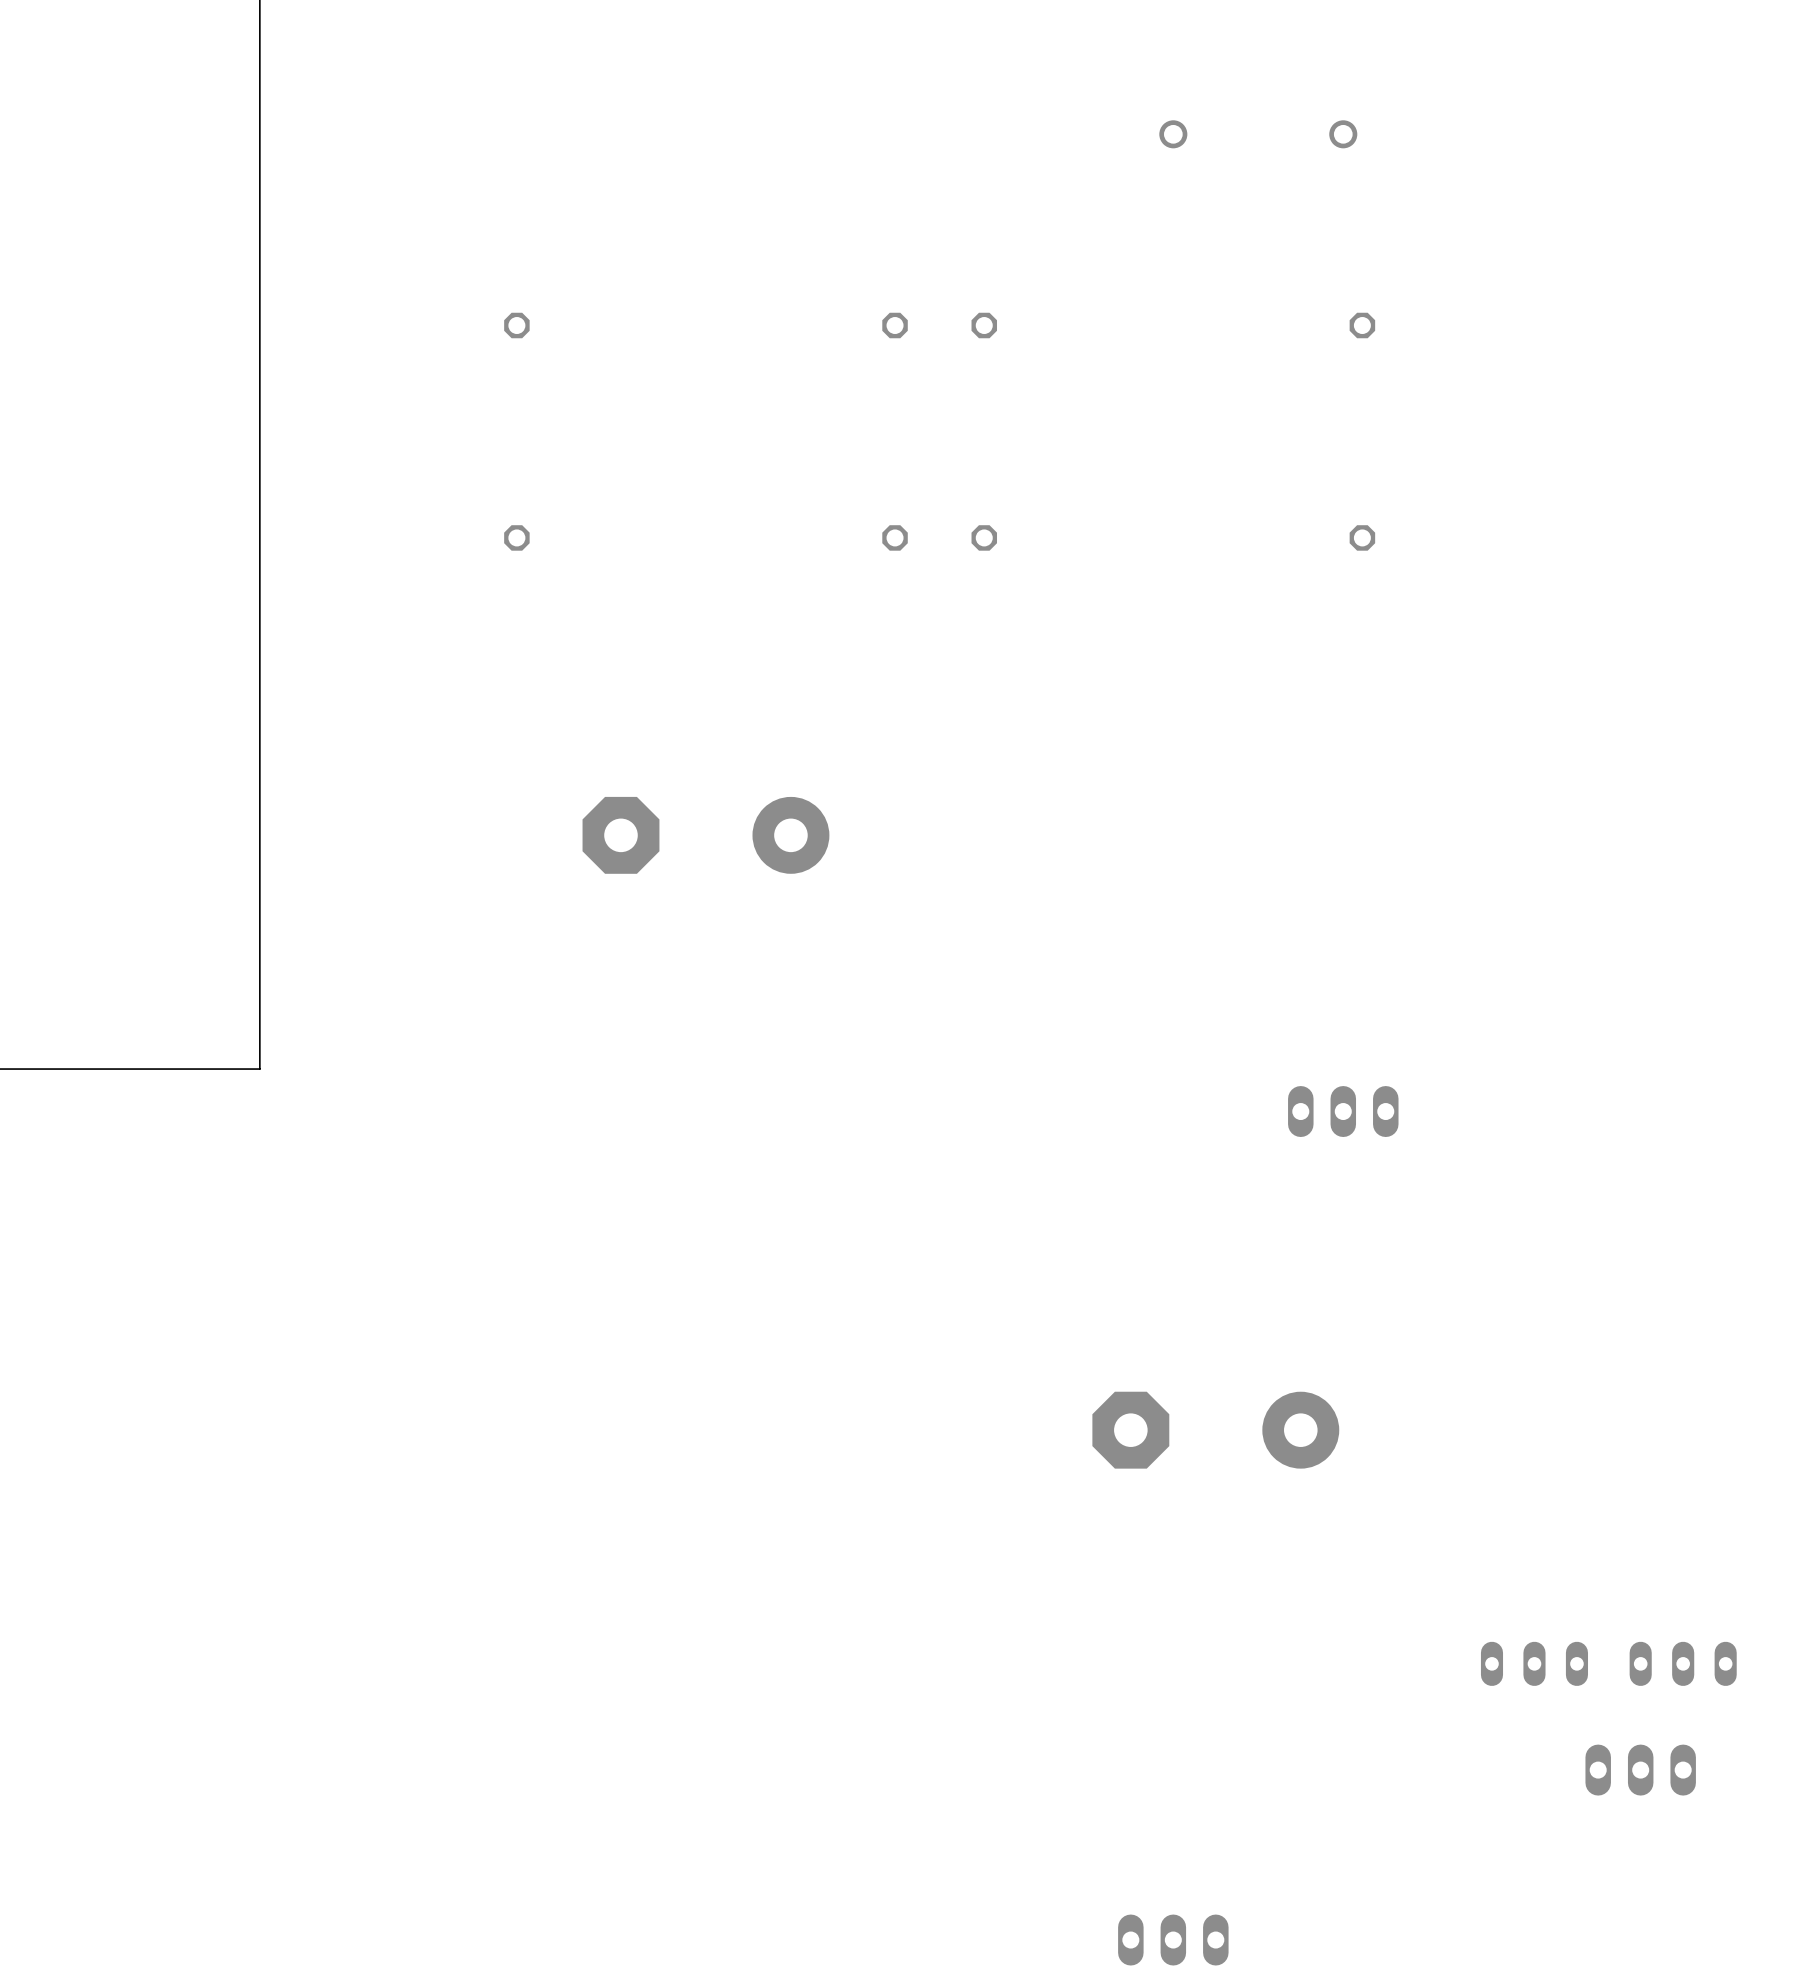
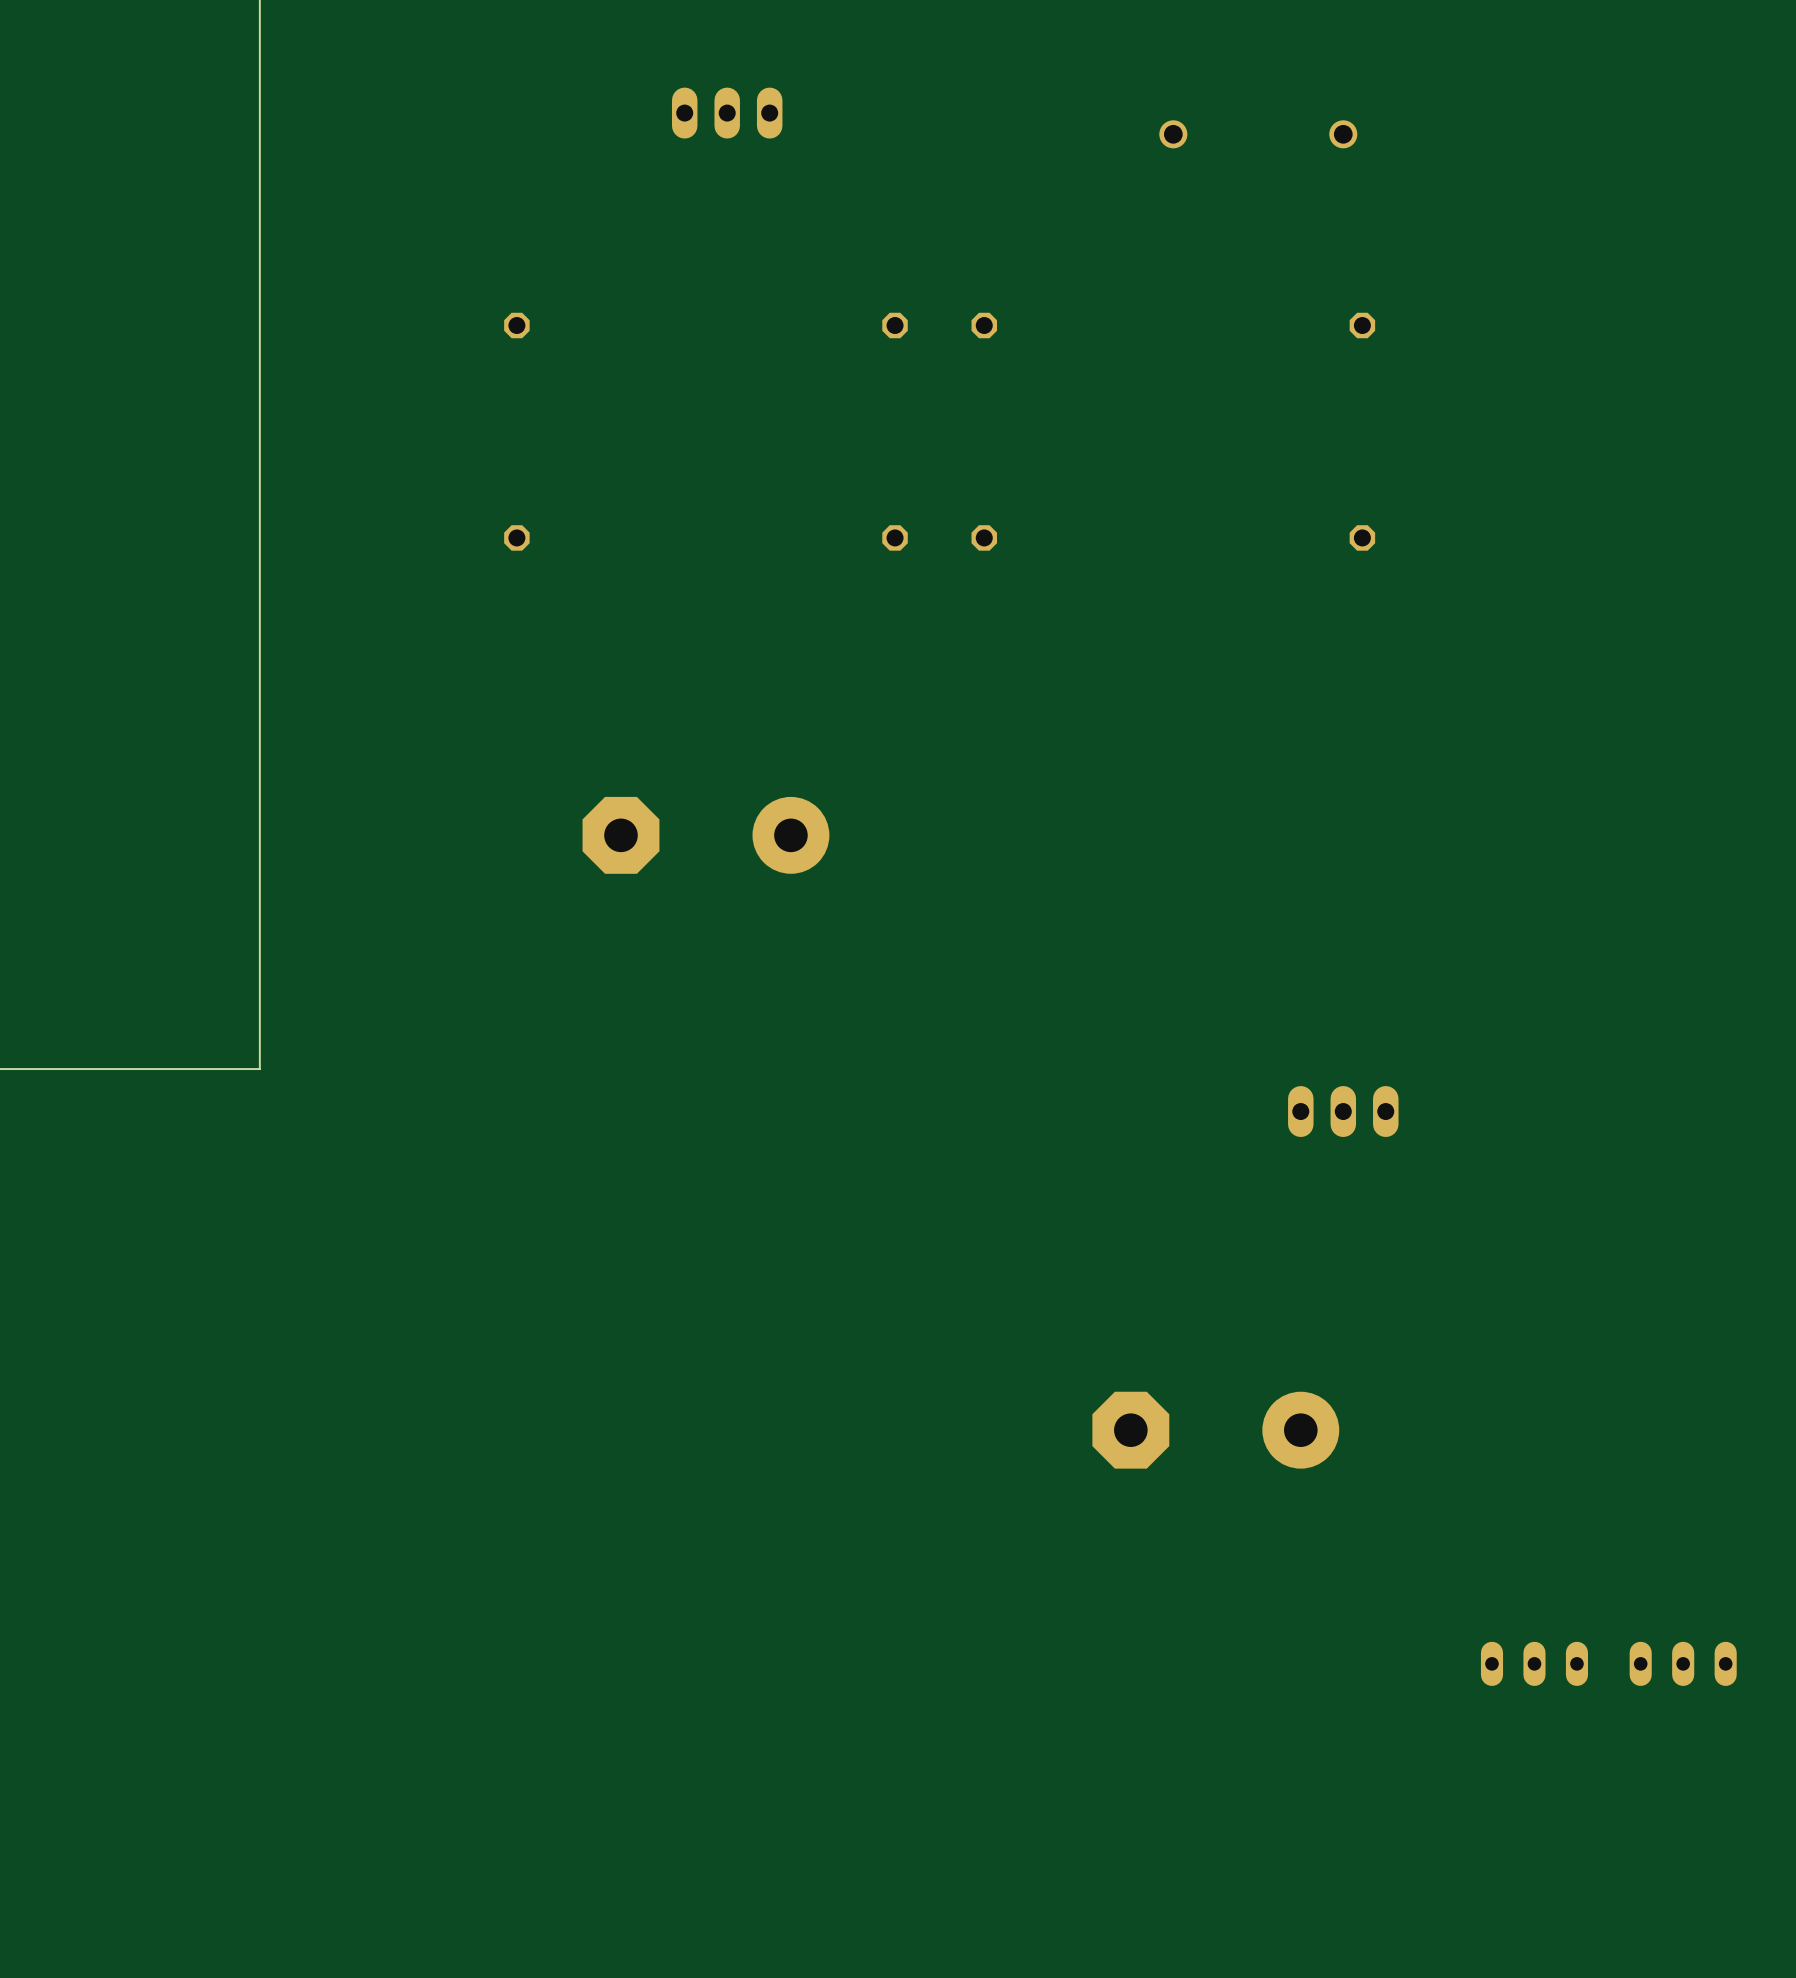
part: none -> (727, 113)
part: (1640, 1770) -> none
part: (1173, 1940) -> none

